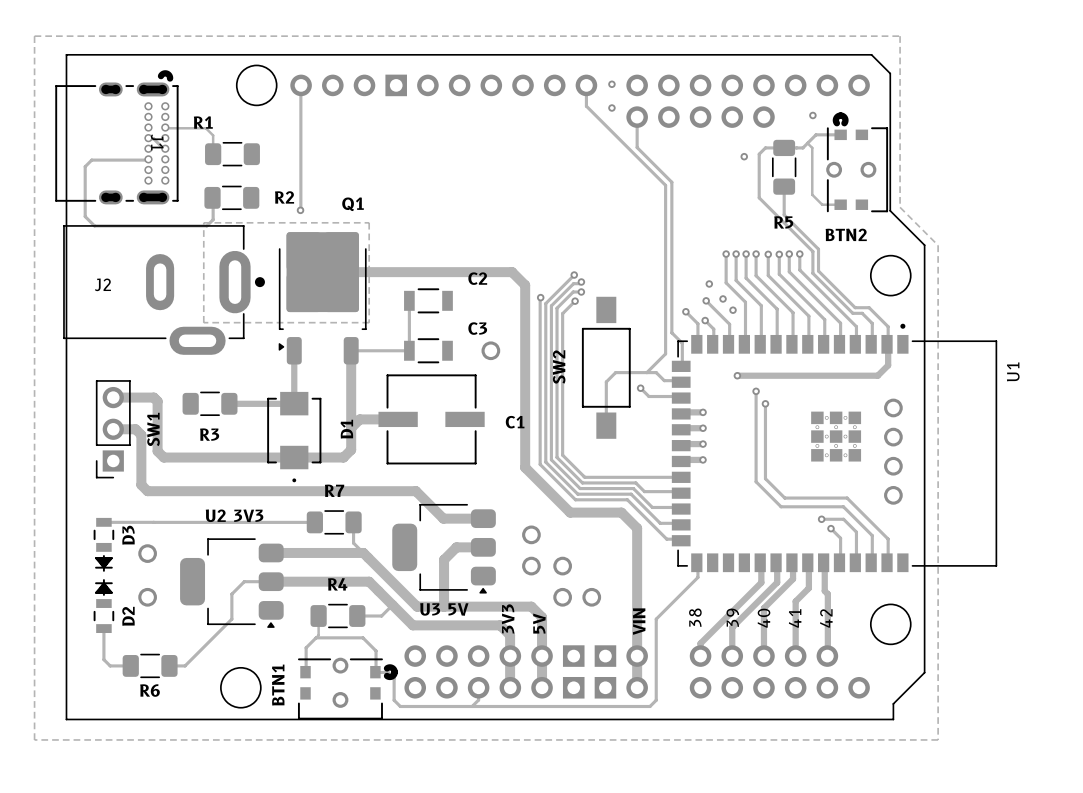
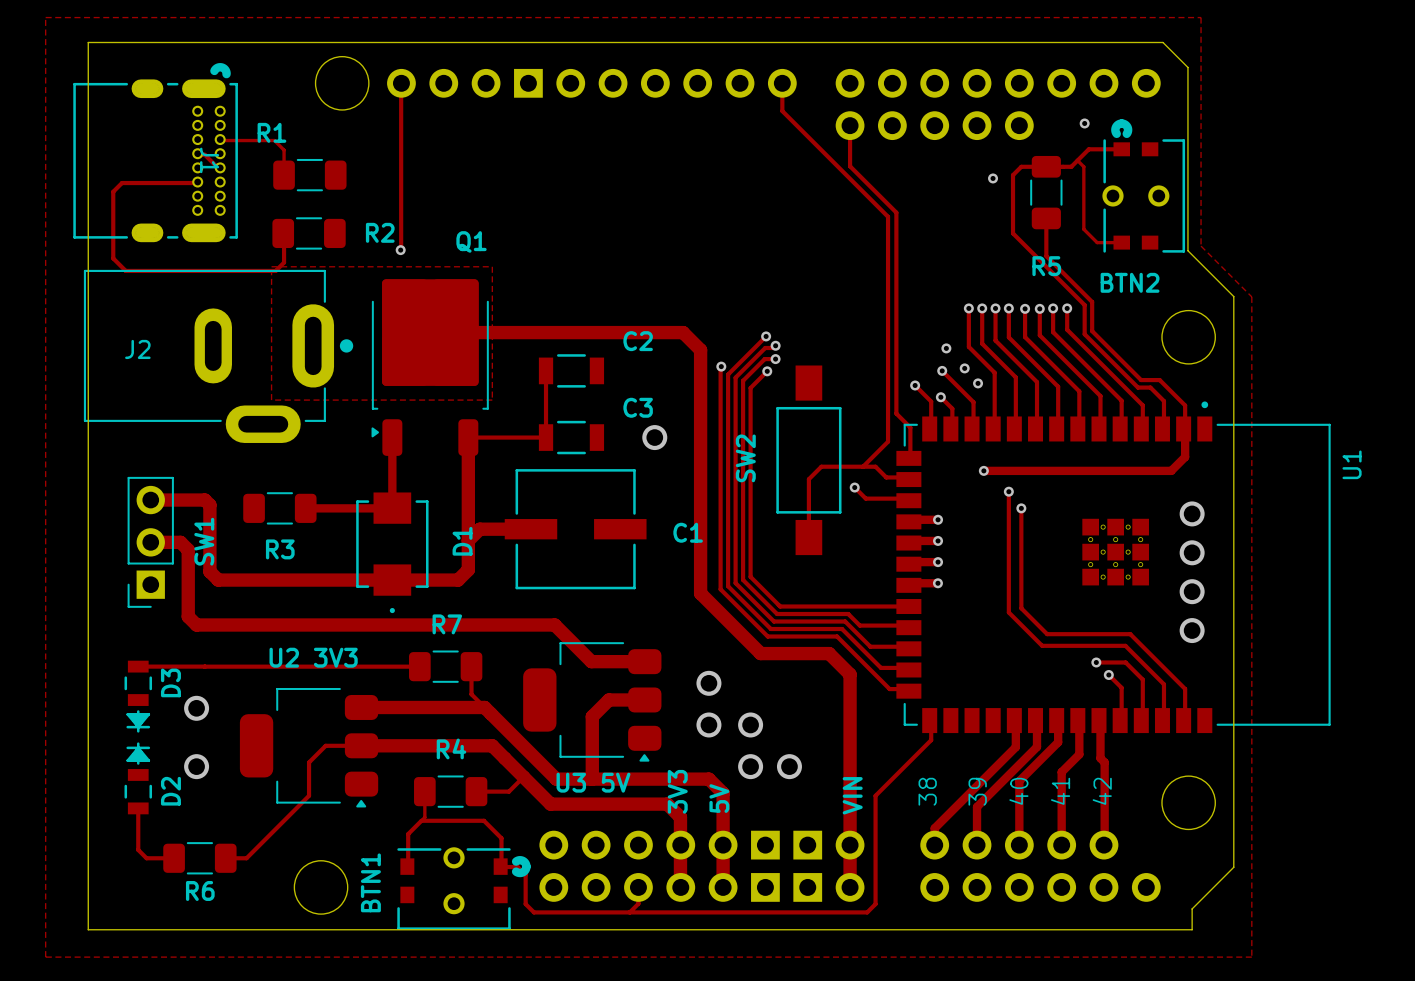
via: (611, 84) -> none
via: (611, 107) -> none

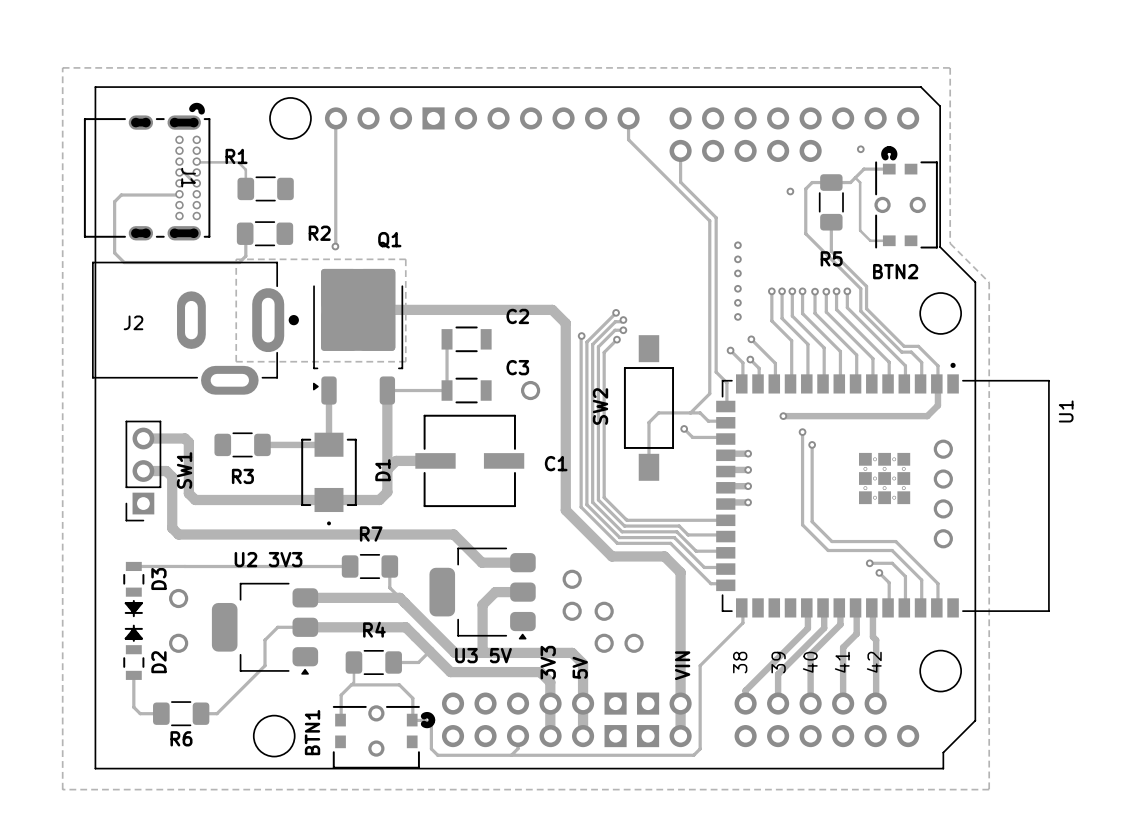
via: none -> (737, 245)
via: none -> (737, 259)
via: none -> (737, 273)
via: none -> (737, 288)
via: none -> (737, 302)
via: none -> (737, 316)
via: (946, 348) -> none
via: (964, 368) -> none
via: (978, 383) -> none

